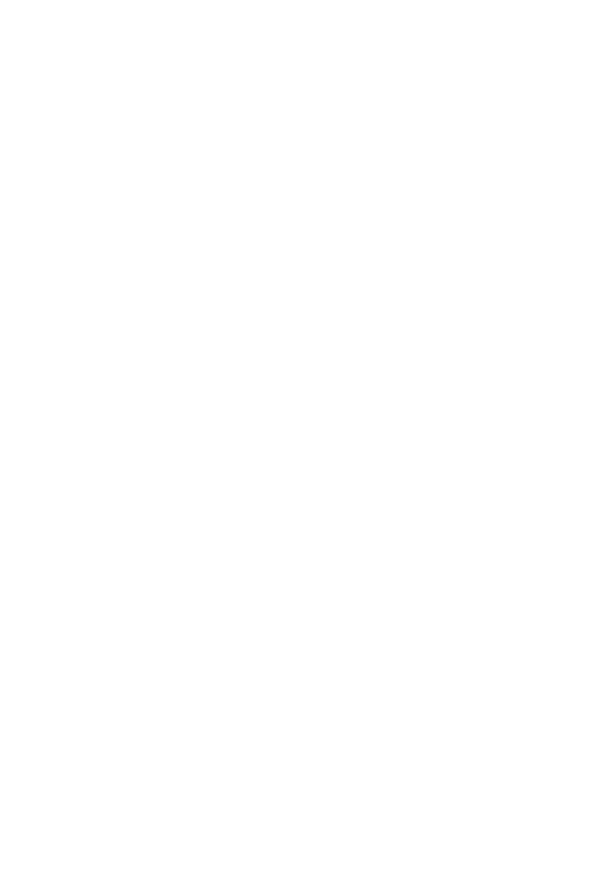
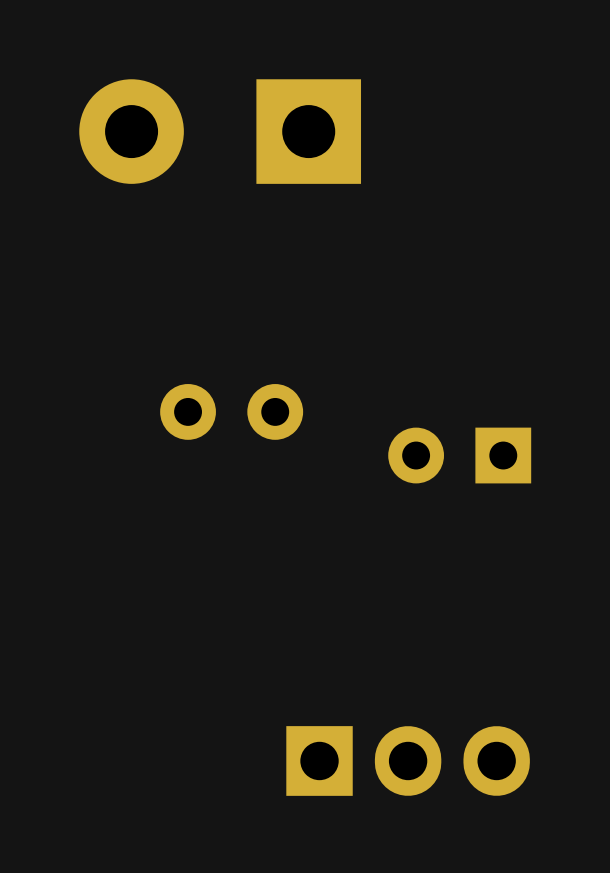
part: none -> (220, 131)
part: none -> (231, 411)
part: none -> (459, 455)
part: none -> (408, 760)

